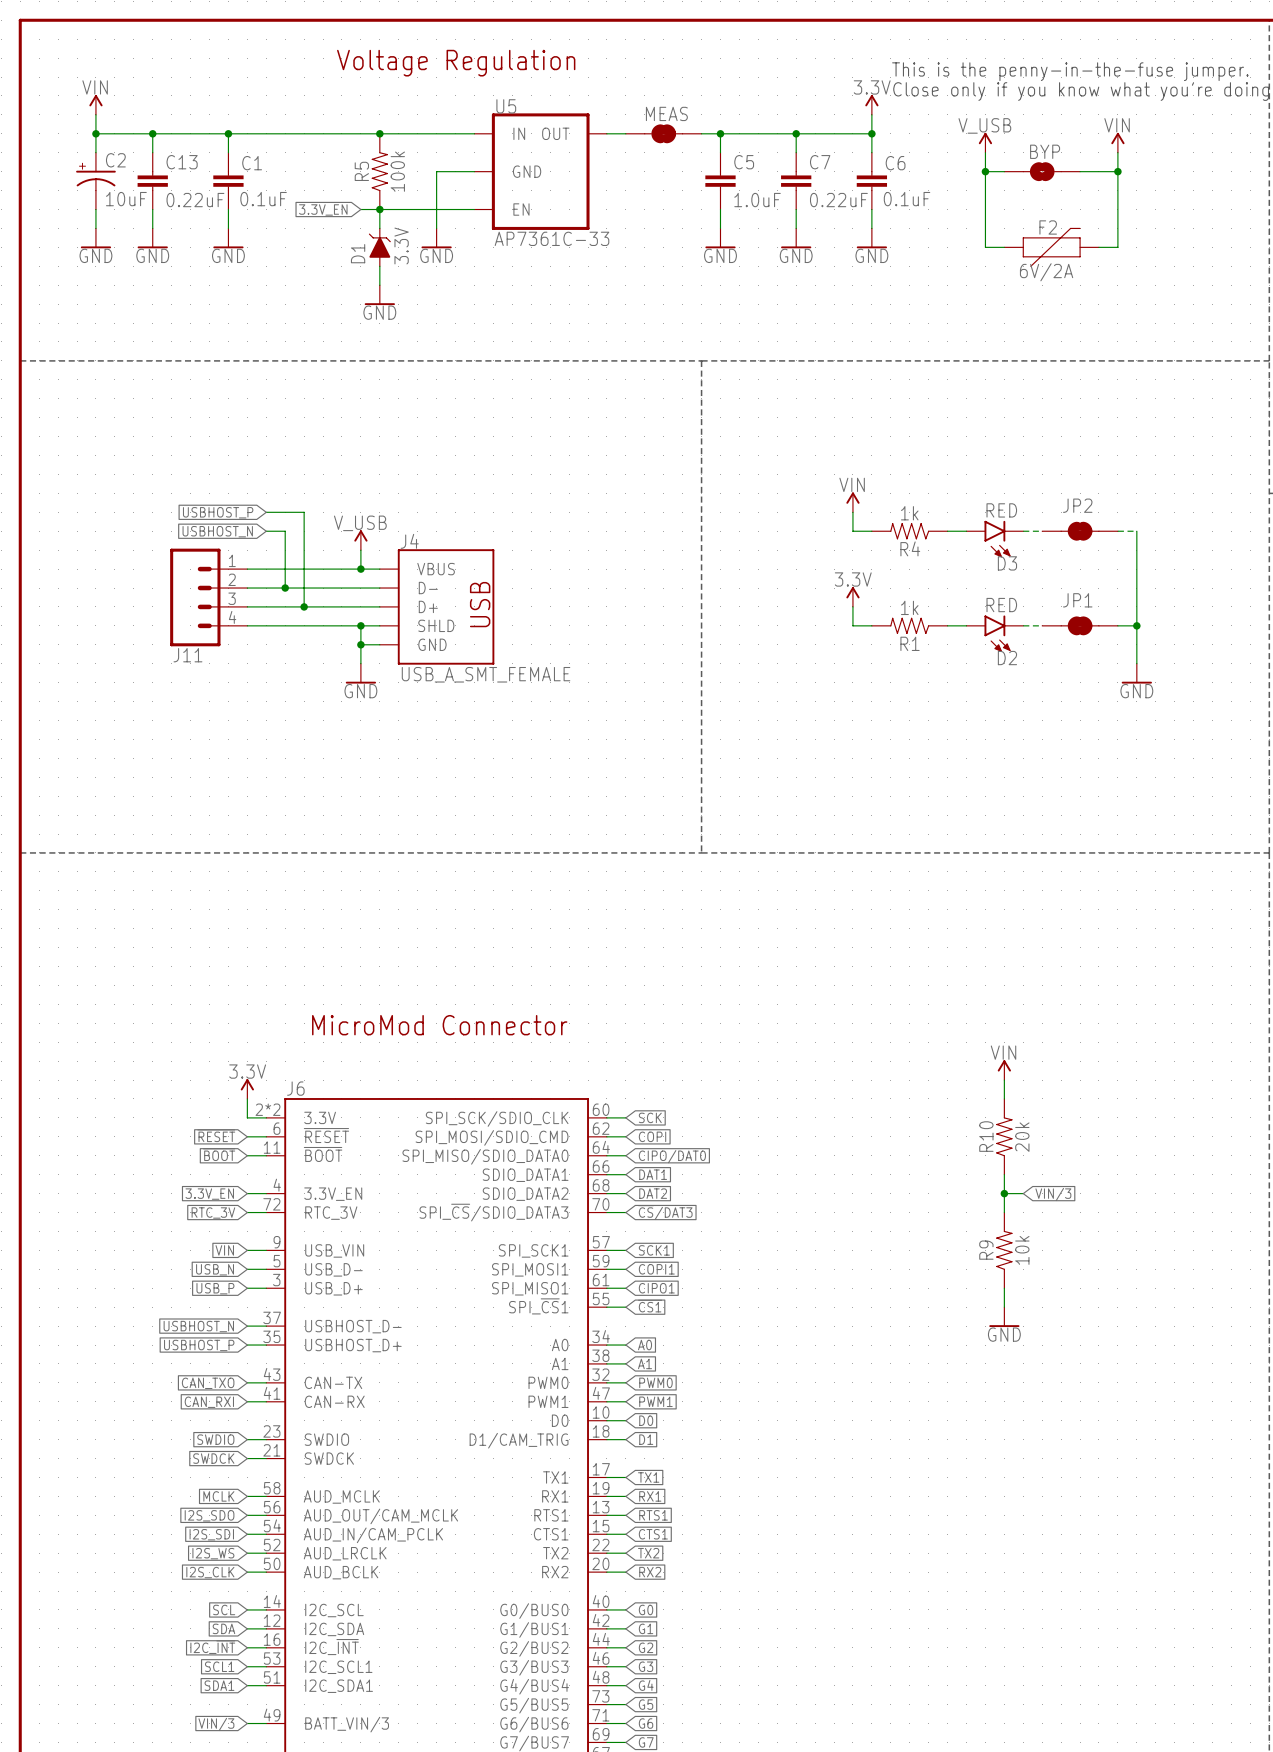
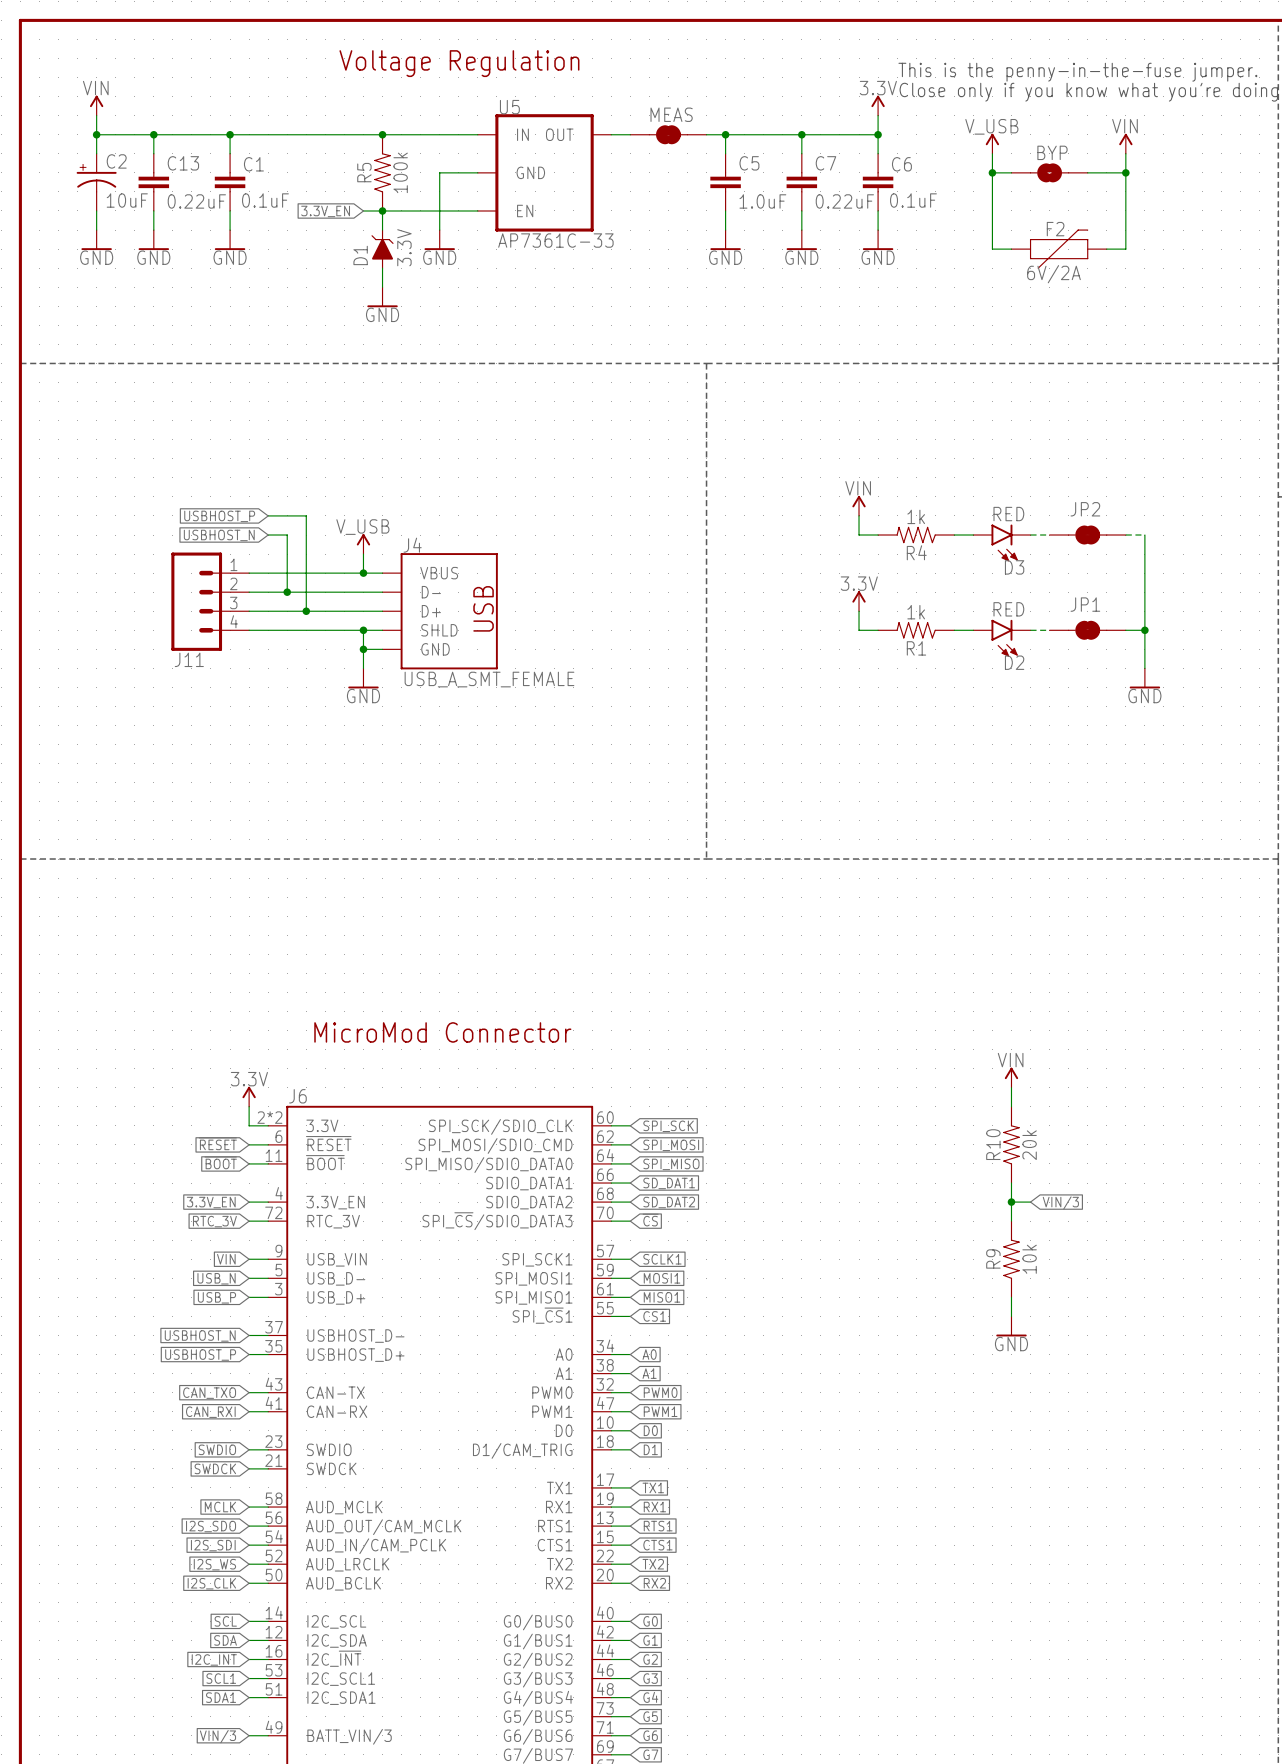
global label: SCK (650, 1117) -> SPI_SCK (668, 1126)
global label: COPI (652, 1136) -> SPI_MOSI (671, 1145)
global label: CIPO/DAT0 (672, 1156) -> SPI_MISO (671, 1164)
global label: DAT1 (653, 1174) -> SD_DAT1 (669, 1183)
global label: DAT2 (653, 1193) -> SD_DAT2 (669, 1202)
global label: ~{CS}/DAT3 (665, 1212) -> ~{CS} (650, 1220)
global label: SCK1 (654, 1250) -> SCLK1 (662, 1259)
global label: COPI1 (656, 1269) -> MOSI1 (662, 1278)
global label: CIPO1 (656, 1288) -> MISO1 (662, 1297)

